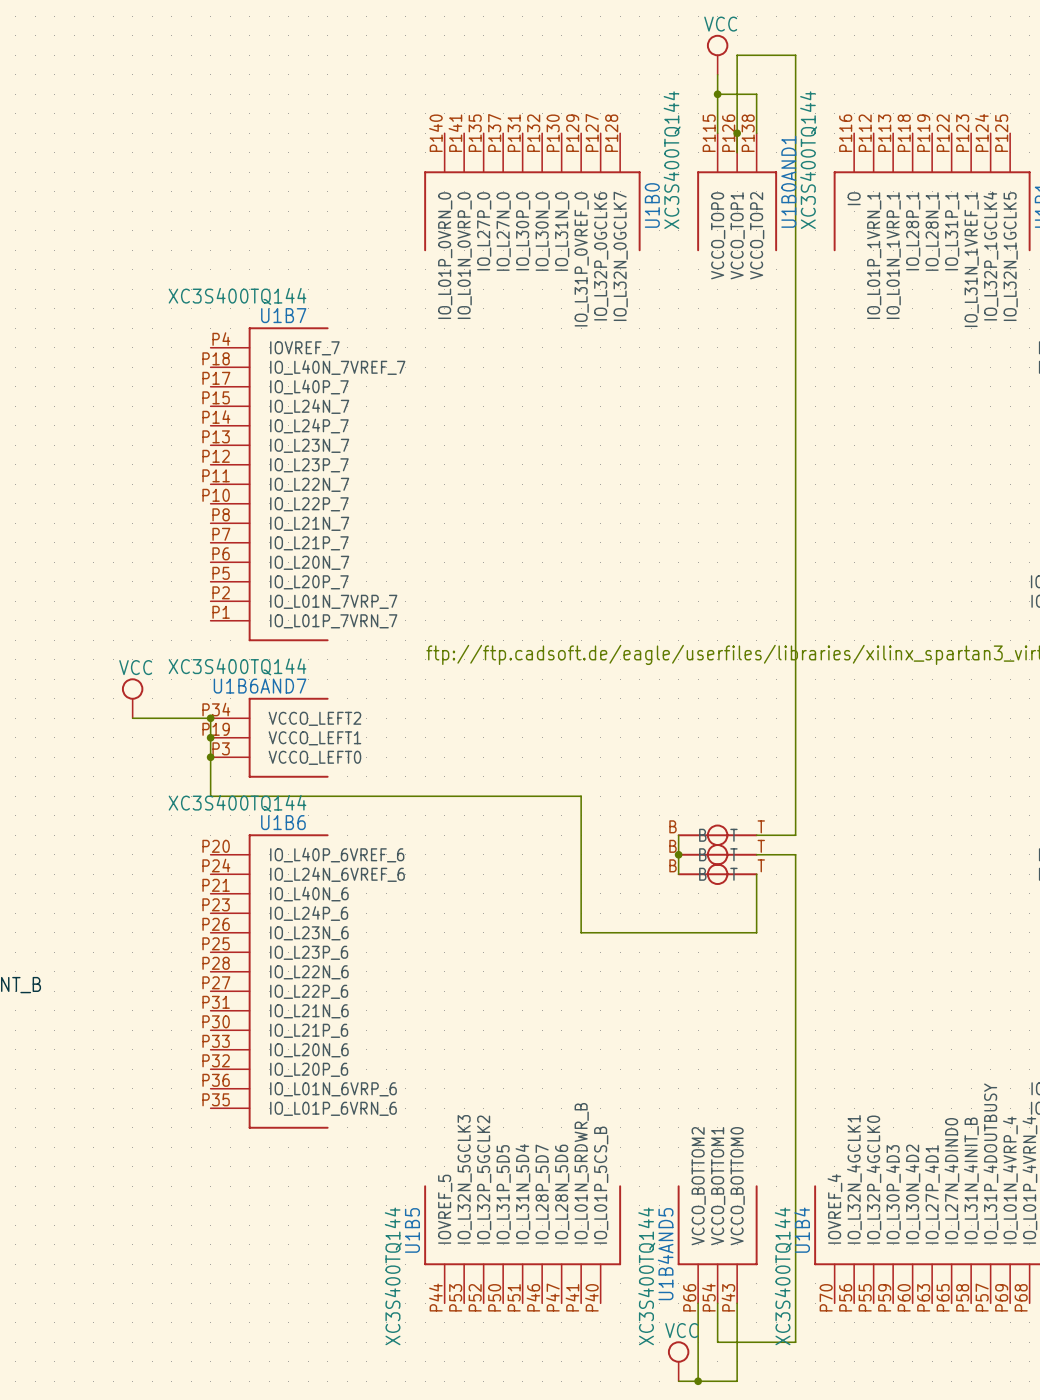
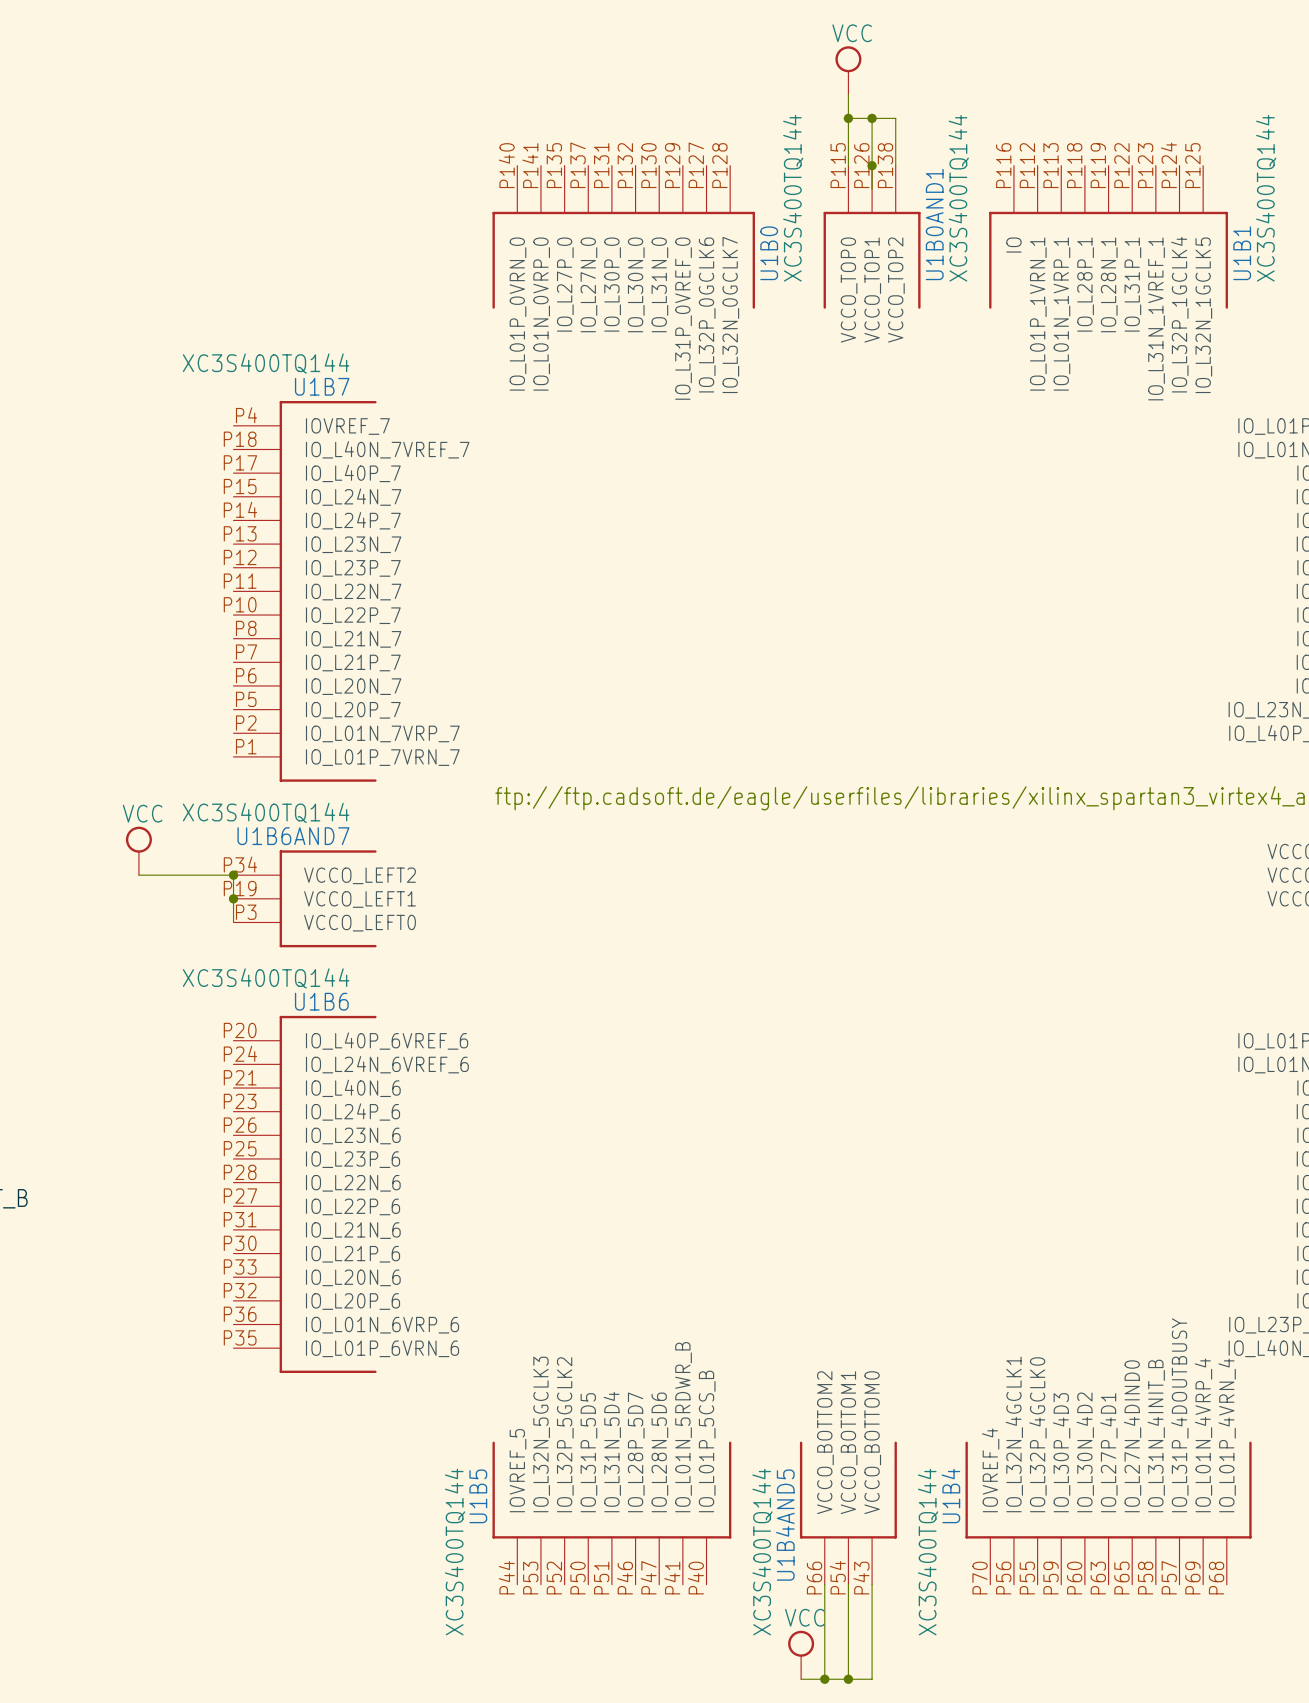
wire: (737, 94) (737, 55) (795, 55) (795, 835) (756, 835) -> none
junction: none -> (872, 118)
wire: (210, 757) (210, 796) (581, 796) (581, 932) (756, 932) (756, 874) -> none
junction: (210, 757) -> none
wire: (678, 835) (678, 874) -> none
part: (717, 835) -> none
junction: (678, 854) -> none
part: (717, 854) -> none
wire: (756, 854) (795, 854) (795, 1342) (717, 1342) -> (848, 1679) (848, 1631)
part: (717, 874) -> none
junction: none -> (848, 1679)

